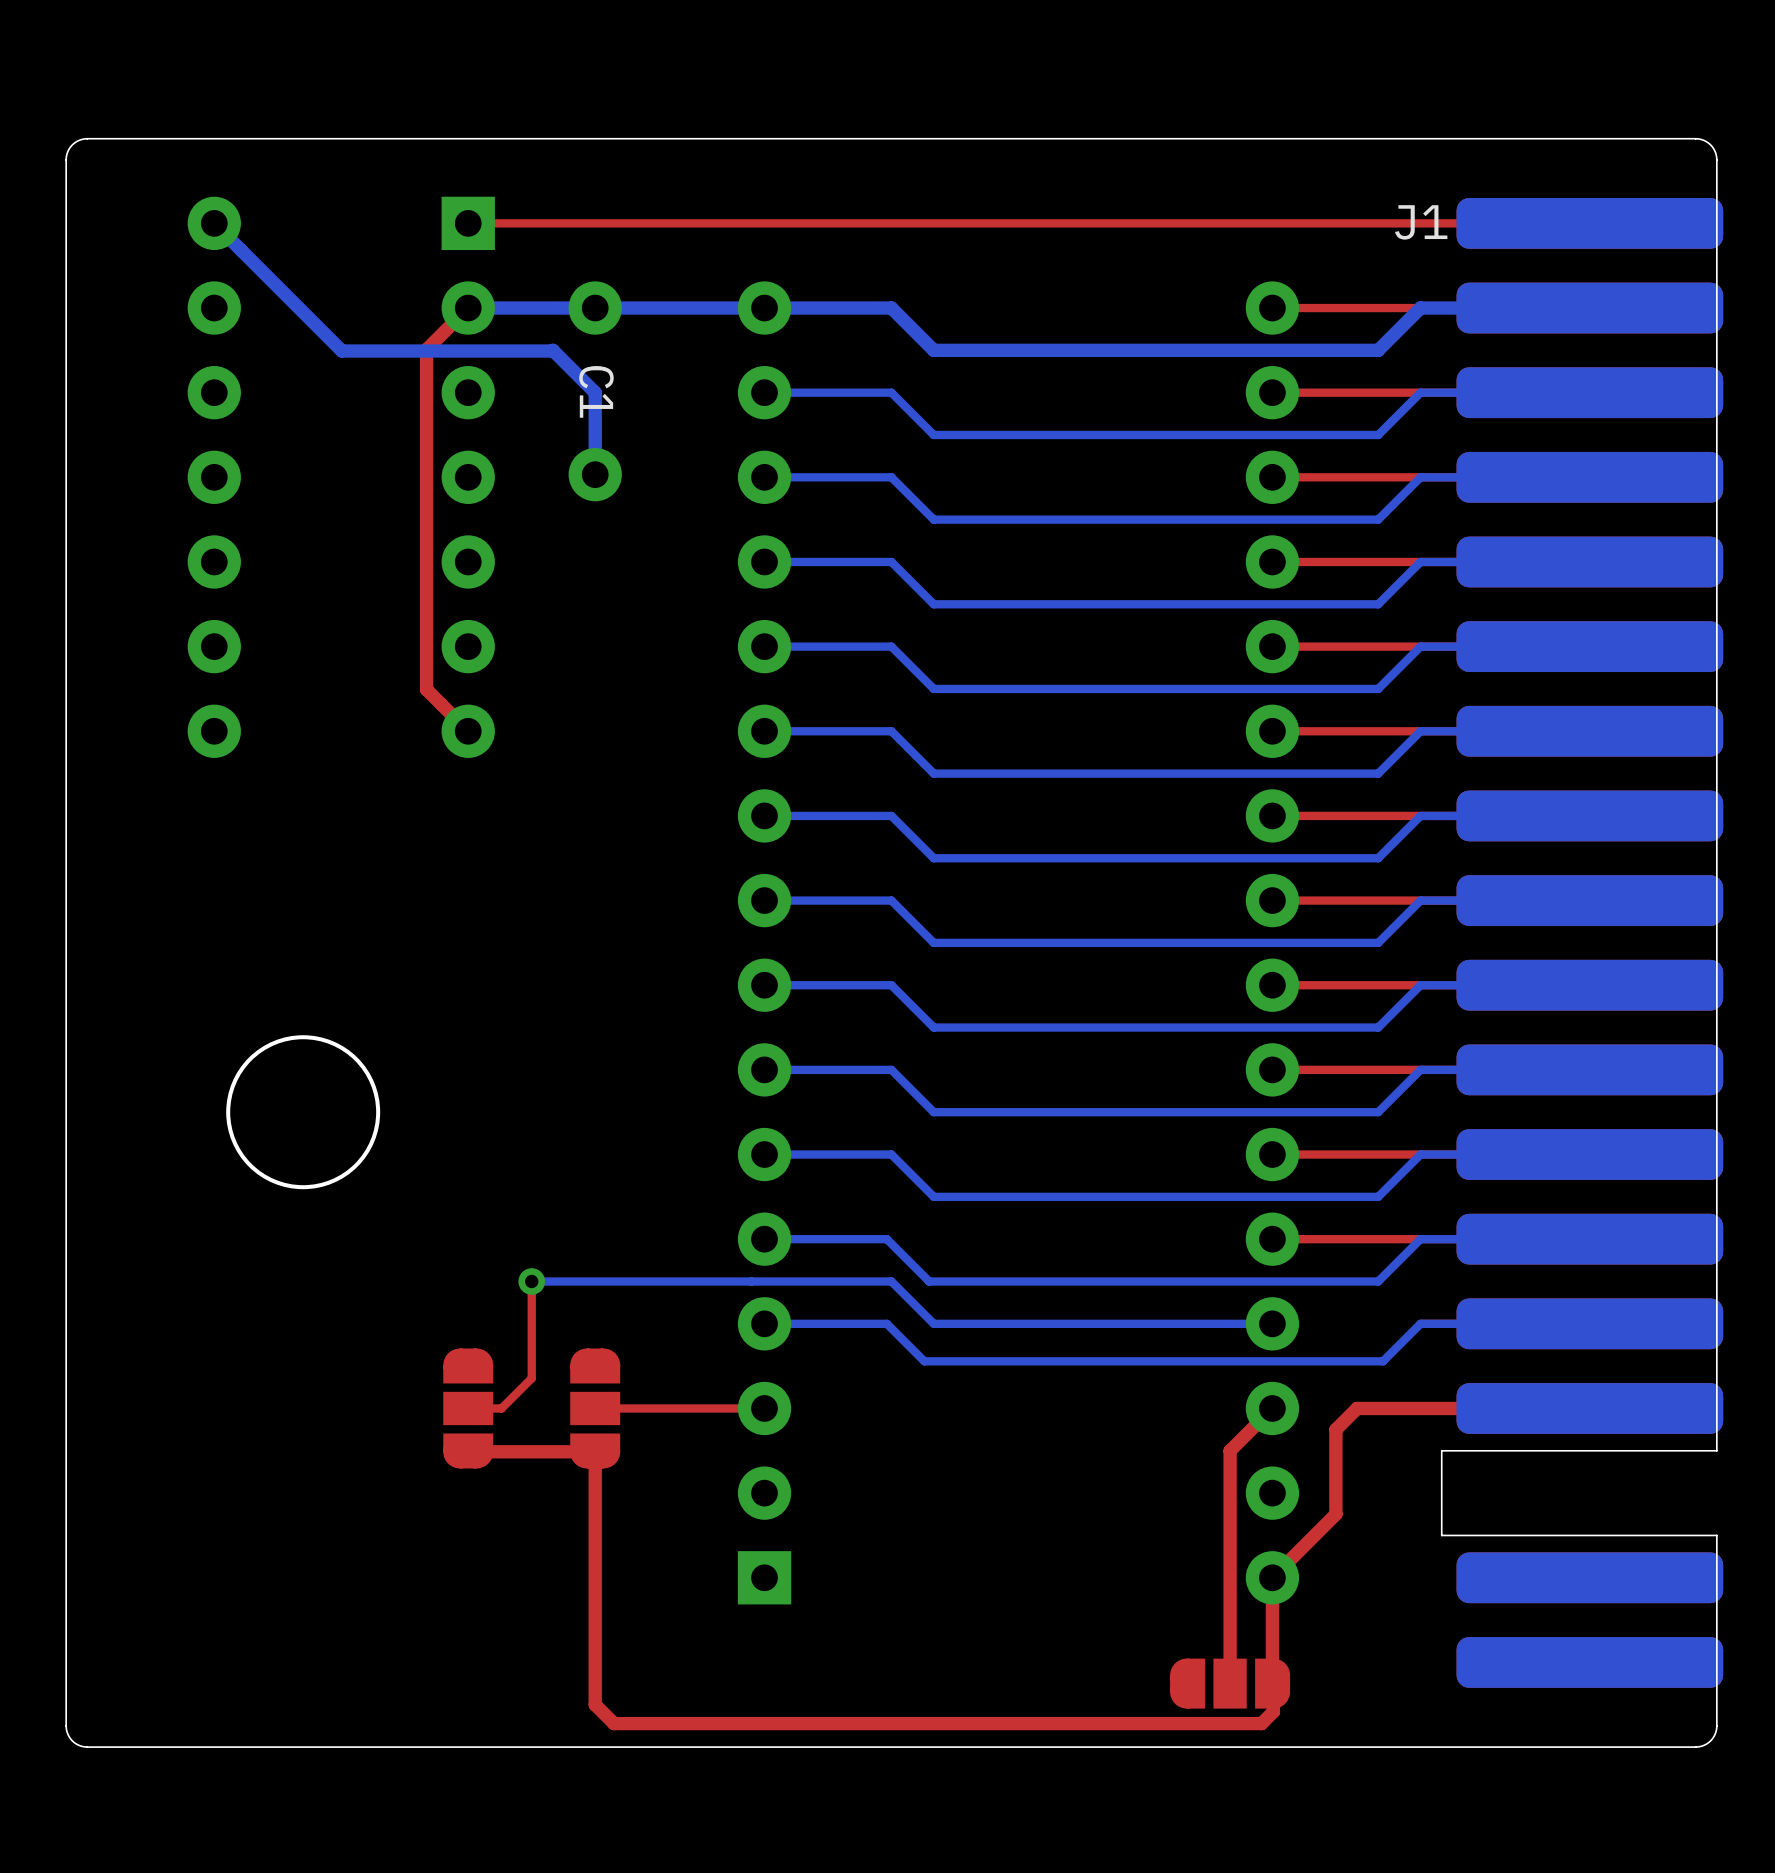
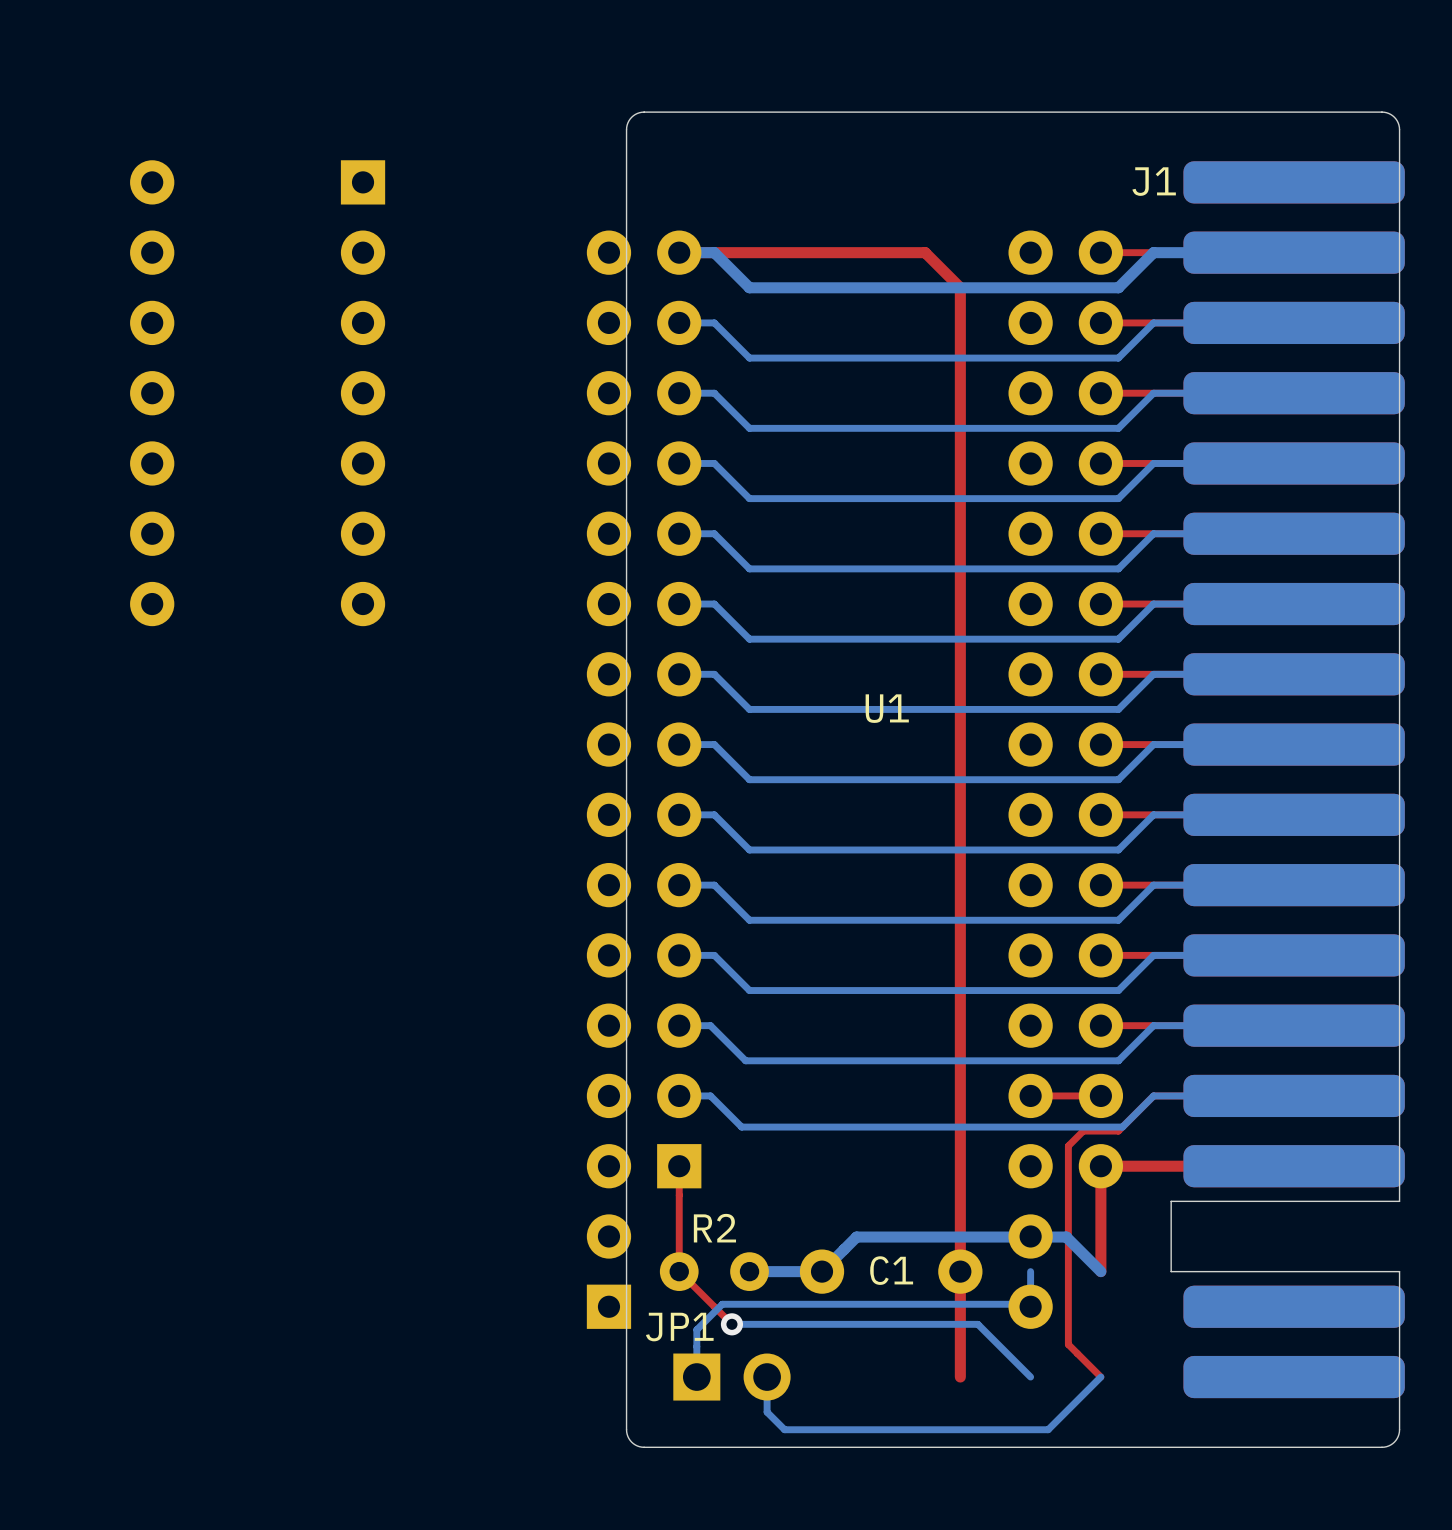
board edge: (806, 138) (87, 138) (79, 140) (72, 144) (67, 151) (66, 159) (66, 1725) (67, 1734) (76, 1744) (87, 1747) (806, 1747) -> (644, 112) (631, 117) (626, 129) (626, 1429) (631, 1442) (644, 1447)
bottom track: (214, 223) (341, 351) (552, 350) (595, 392) (595, 474) -> none
top track: (1589, 223) (468, 223) -> none
top track: (468, 308) (426, 349) (426, 689) (468, 731) -> none
bottom track: (849, 308) (468, 308) -> none
top track: none -> (679, 252) (925, 252) (960, 287) (960, 1377)
top track: (1357, 308) (1272, 308) -> none
C1 rotation: 0° (595, 391) -> 90° clockwise (891, 1271)
C1 position: (595, 391) -> (891, 1271)
bottom track: (849, 392) (764, 392) -> none
top track: (1357, 392) (1272, 392) -> none
bottom track: (849, 477) (764, 477) -> none
top track: (1357, 477) (1272, 477) -> none
bottom track: (849, 561) (764, 561) -> none
top track: (1357, 561) (1272, 561) -> none
bottom track: (849, 646) (764, 646) -> none
top track: (1357, 646) (1272, 646) -> none
bottom track: (849, 731) (764, 731) -> none
top track: (1357, 731) (1272, 731) -> none
bottom track: (849, 815) (764, 815) -> none
top track: (1357, 815) (1272, 815) -> none
U1: none -> (890, 709)
bottom track: (849, 900) (764, 900) -> none
top track: (1357, 900) (1272, 900) -> none
bottom track: (849, 985) (764, 985) -> none
top track: (1357, 985) (1272, 985) -> none
round board edge: [226, 1035, 381, 1190] -> none
bottom track: (849, 1069) (764, 1069) -> none
top track: (1357, 1069) (1272, 1069) -> none
bottom track: (849, 1154) (764, 1154) -> none
top track: (1357, 1154) (1272, 1154) -> none
bottom track: (849, 1239) (764, 1239) -> none
top track: (1357, 1239) (1272, 1239) -> none
bottom track: (531, 1281) (891, 1281) (933, 1323) (1272, 1323) -> none
top track: (531, 1281) (531, 1378) (501, 1408) (468, 1408) -> none
via: (531, 1281) -> none
bottom track: (849, 1323) (764, 1323) -> none
top track: none -> (1100, 1095) (1048, 1095)
top track: none -> (1153, 1095) (1118, 1131) (1083, 1131) (1068, 1146) (1068, 1344) (1100, 1377)
part: (468, 1408) -> none
part: (595, 1408) -> none
top track: (764, 1408) (595, 1408) -> none
top track: none -> (679, 1166) (679, 1271) (731, 1324)
top track: (1272, 1408) (1230, 1450) (1230, 1683) -> none
top track: (1357, 1408) (1335, 1429) (1335, 1514) (1272, 1577) (1273, 1711) (1261, 1723) (614, 1723) (595, 1704) (595, 1451) (468, 1451) -> (1100, 1166) (1100, 1271)
R2: none -> (714, 1271)
bottom track: none -> (1030, 1271) (1030, 1299)
bottom track: none -> (1100, 1271) (1066, 1237) (856, 1237) (822, 1271) (749, 1271)
bottom track: none -> (1025, 1304) (722, 1304) (696, 1329) (696, 1377)
bottom track: none -> (731, 1324) (977, 1324) (1030, 1377)
via: none -> (731, 1324)
JP1: none -> (731, 1377)
bottom track: none -> (1100, 1377) (1048, 1429) (784, 1429) (767, 1412) (767, 1377)
part: (1230, 1683) -> none

